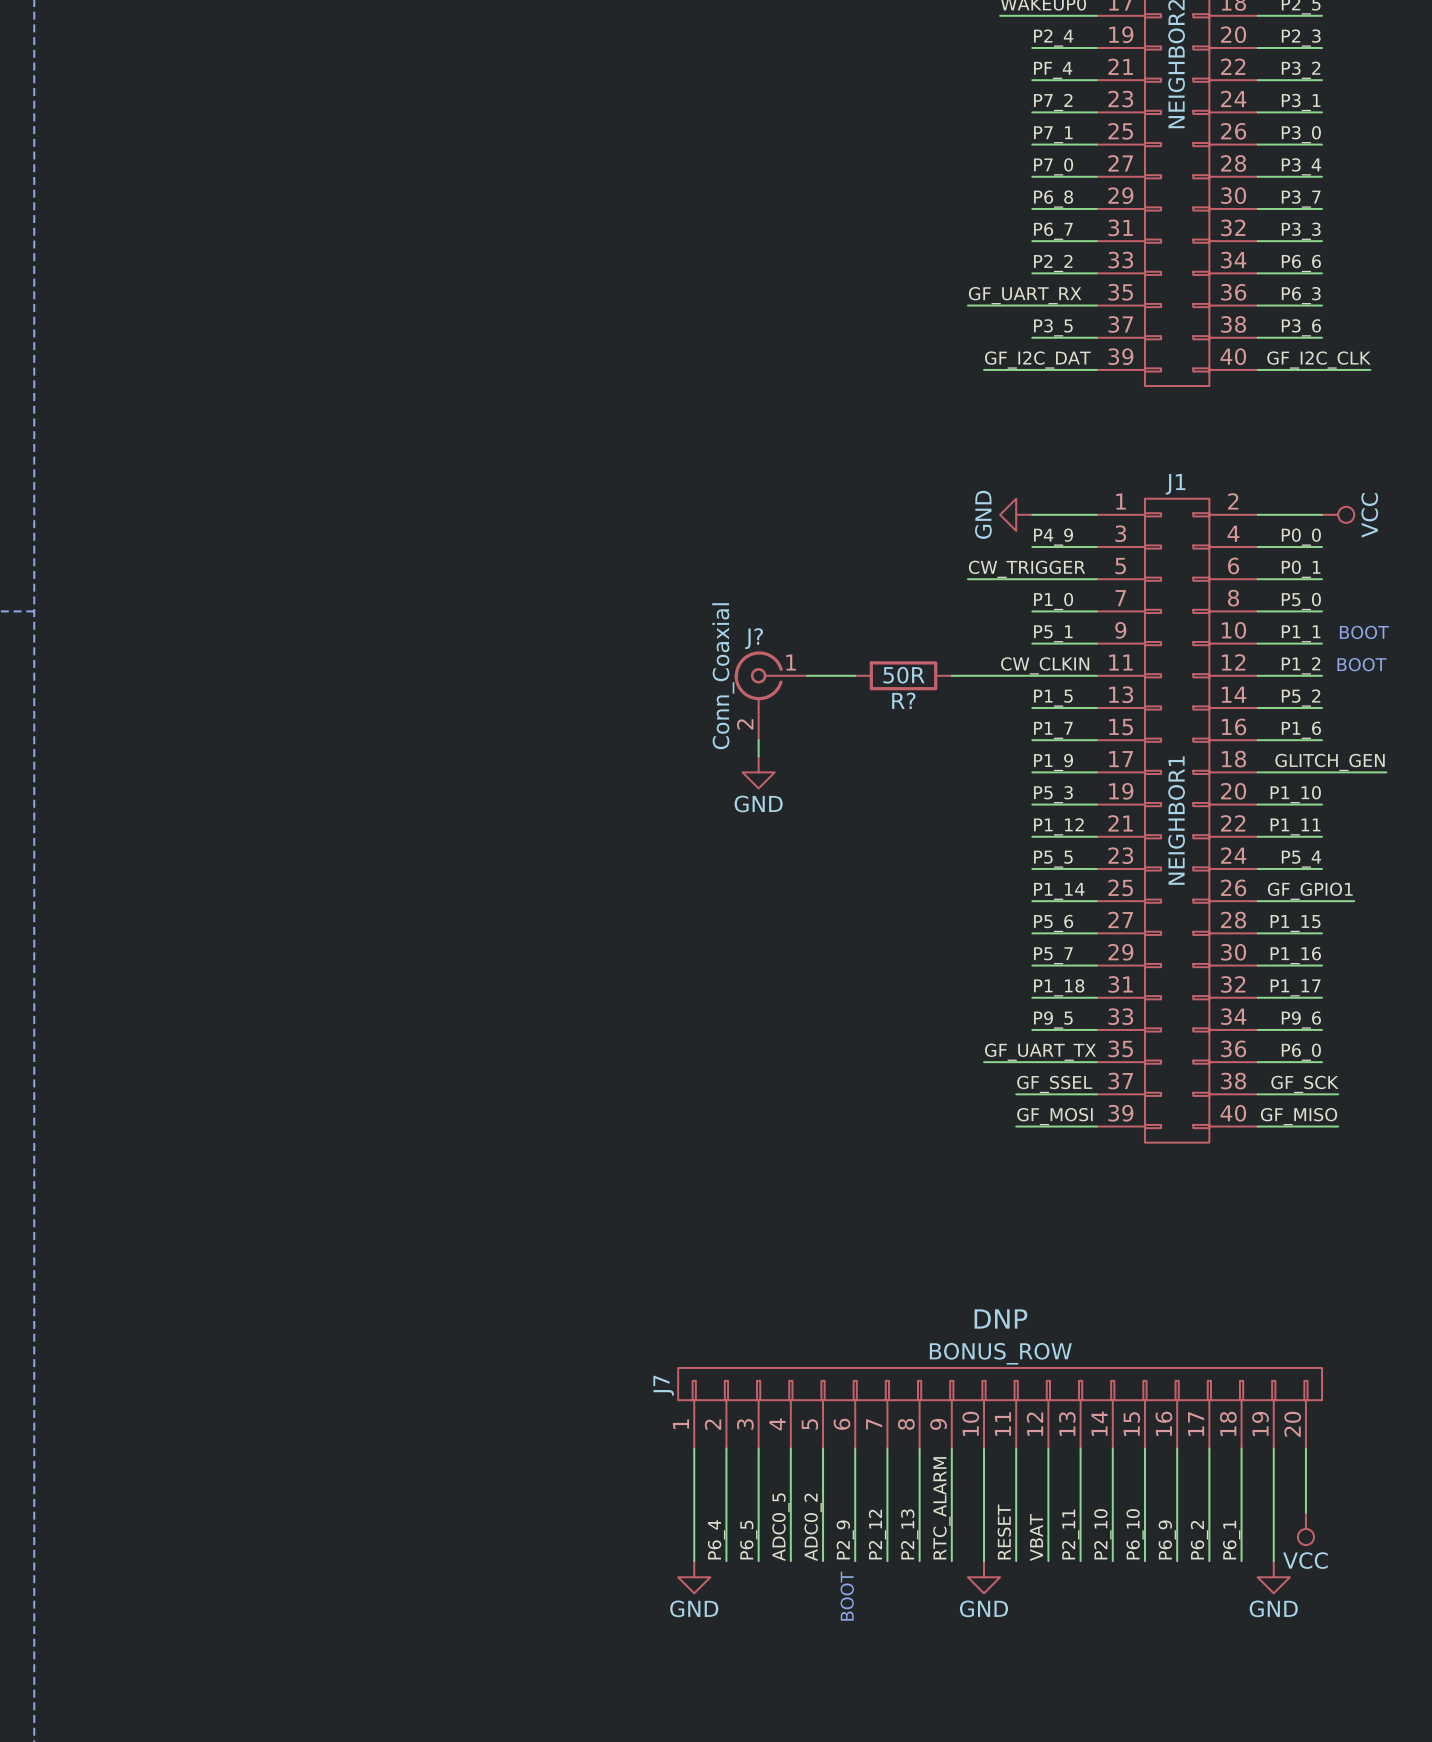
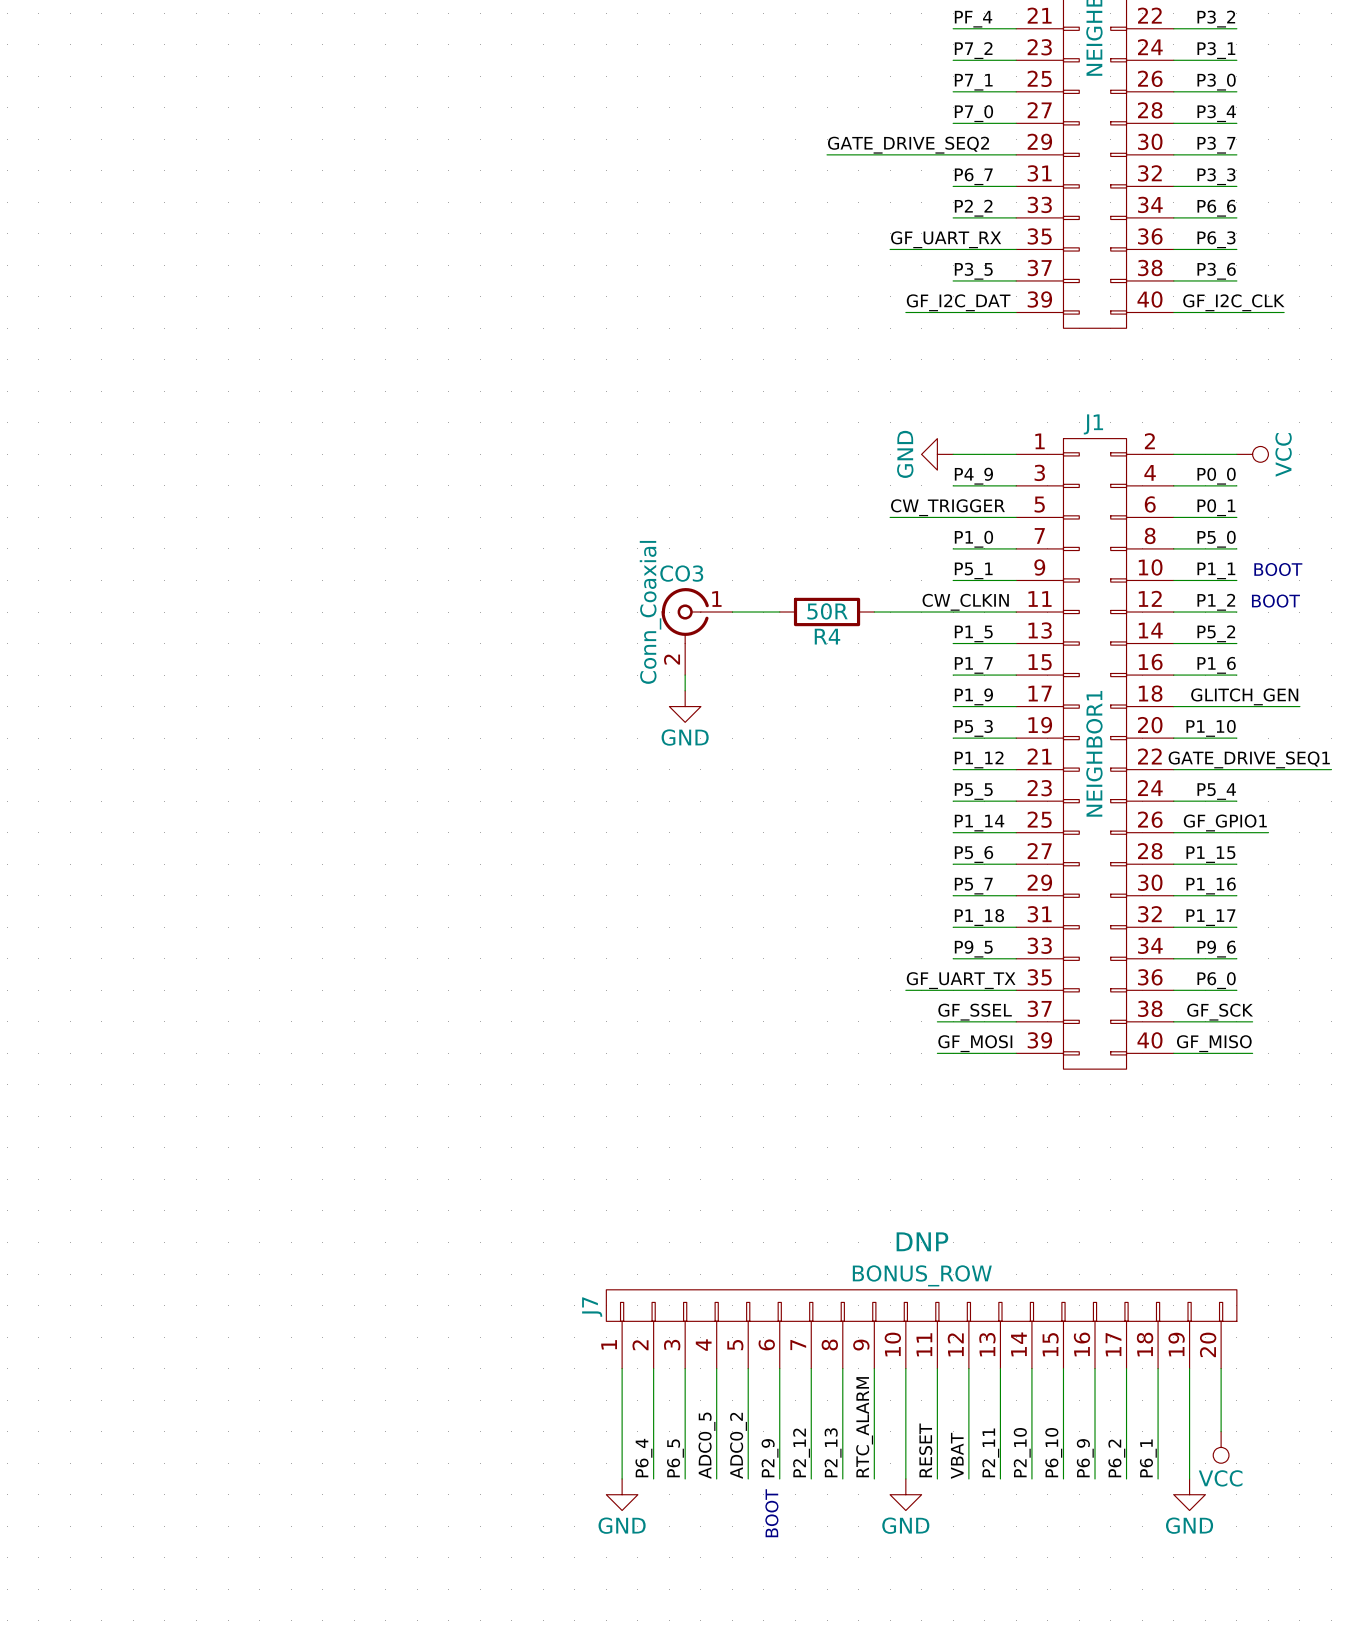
label: none -> GATE_DRIVE_SEQ2 (908, 145)
label: P6_8 (1053, 199) -> none
wire: none -> (827, 154) (953, 154)
J? name: J? (754, 638) -> CO3 (681, 573)
R? name: R? (903, 700) -> R4 (827, 636)
label: P1_11 (1295, 826) -> none
label: none -> GATE_DRIVE_SEQ1 (1249, 759)
wire: none -> (1236, 769) (1331, 769)

